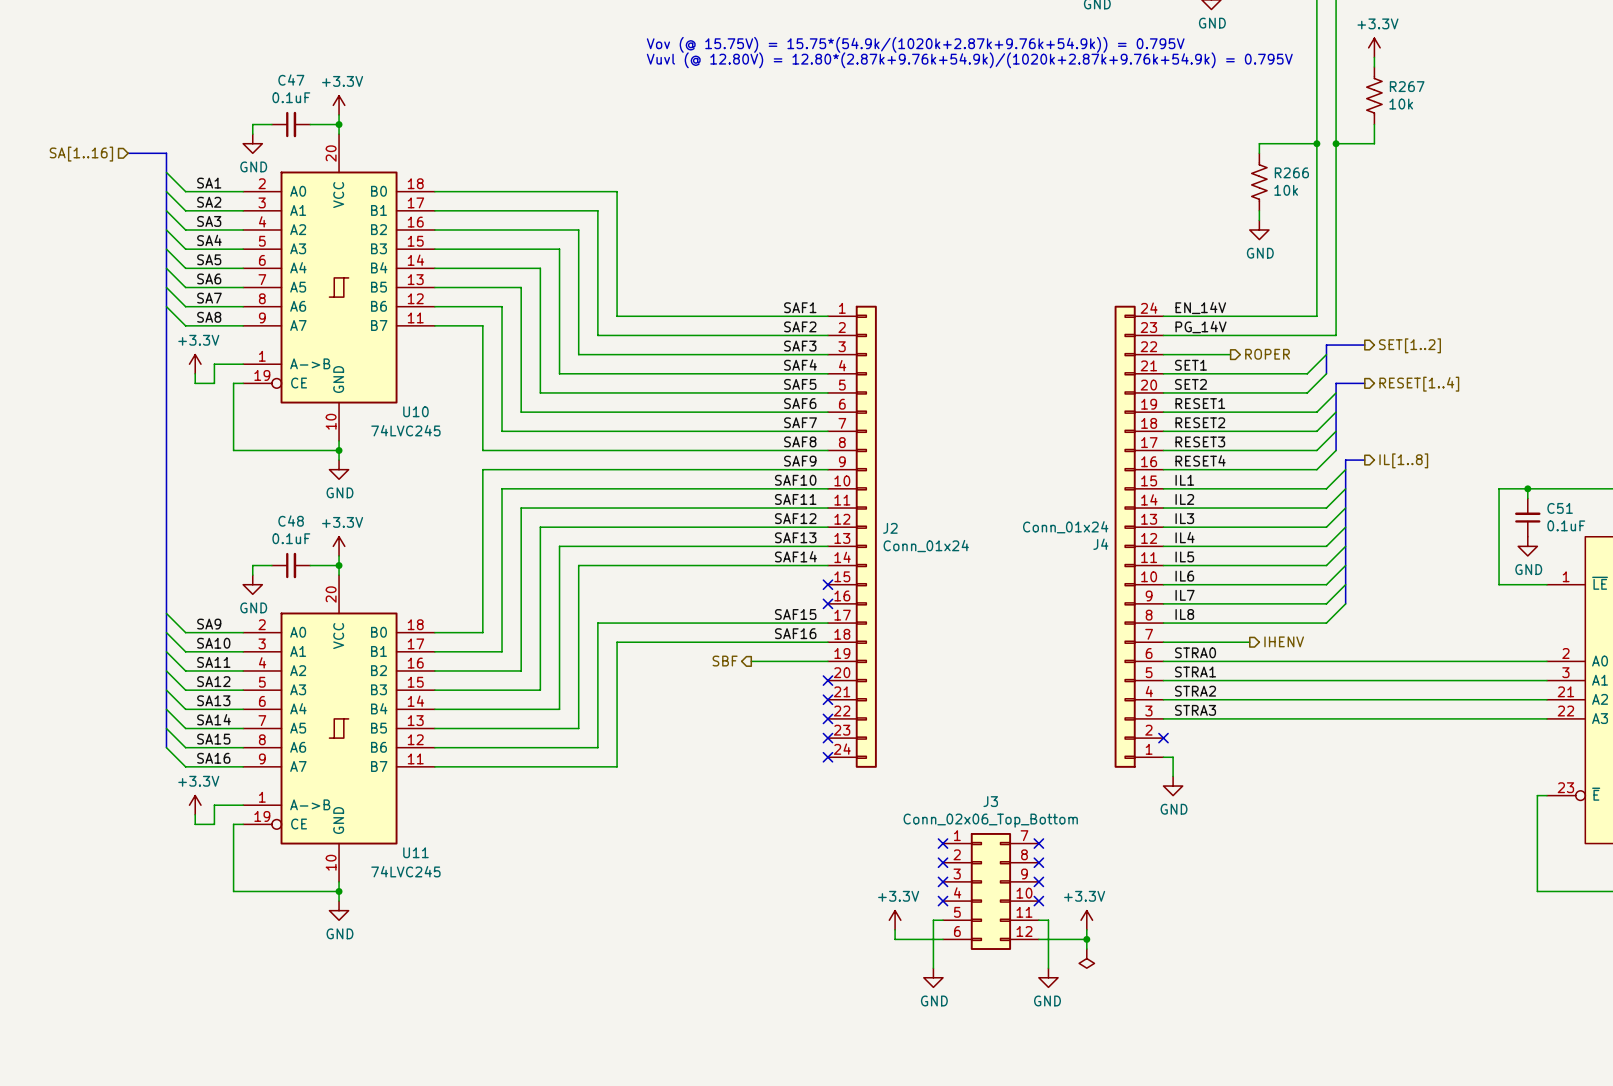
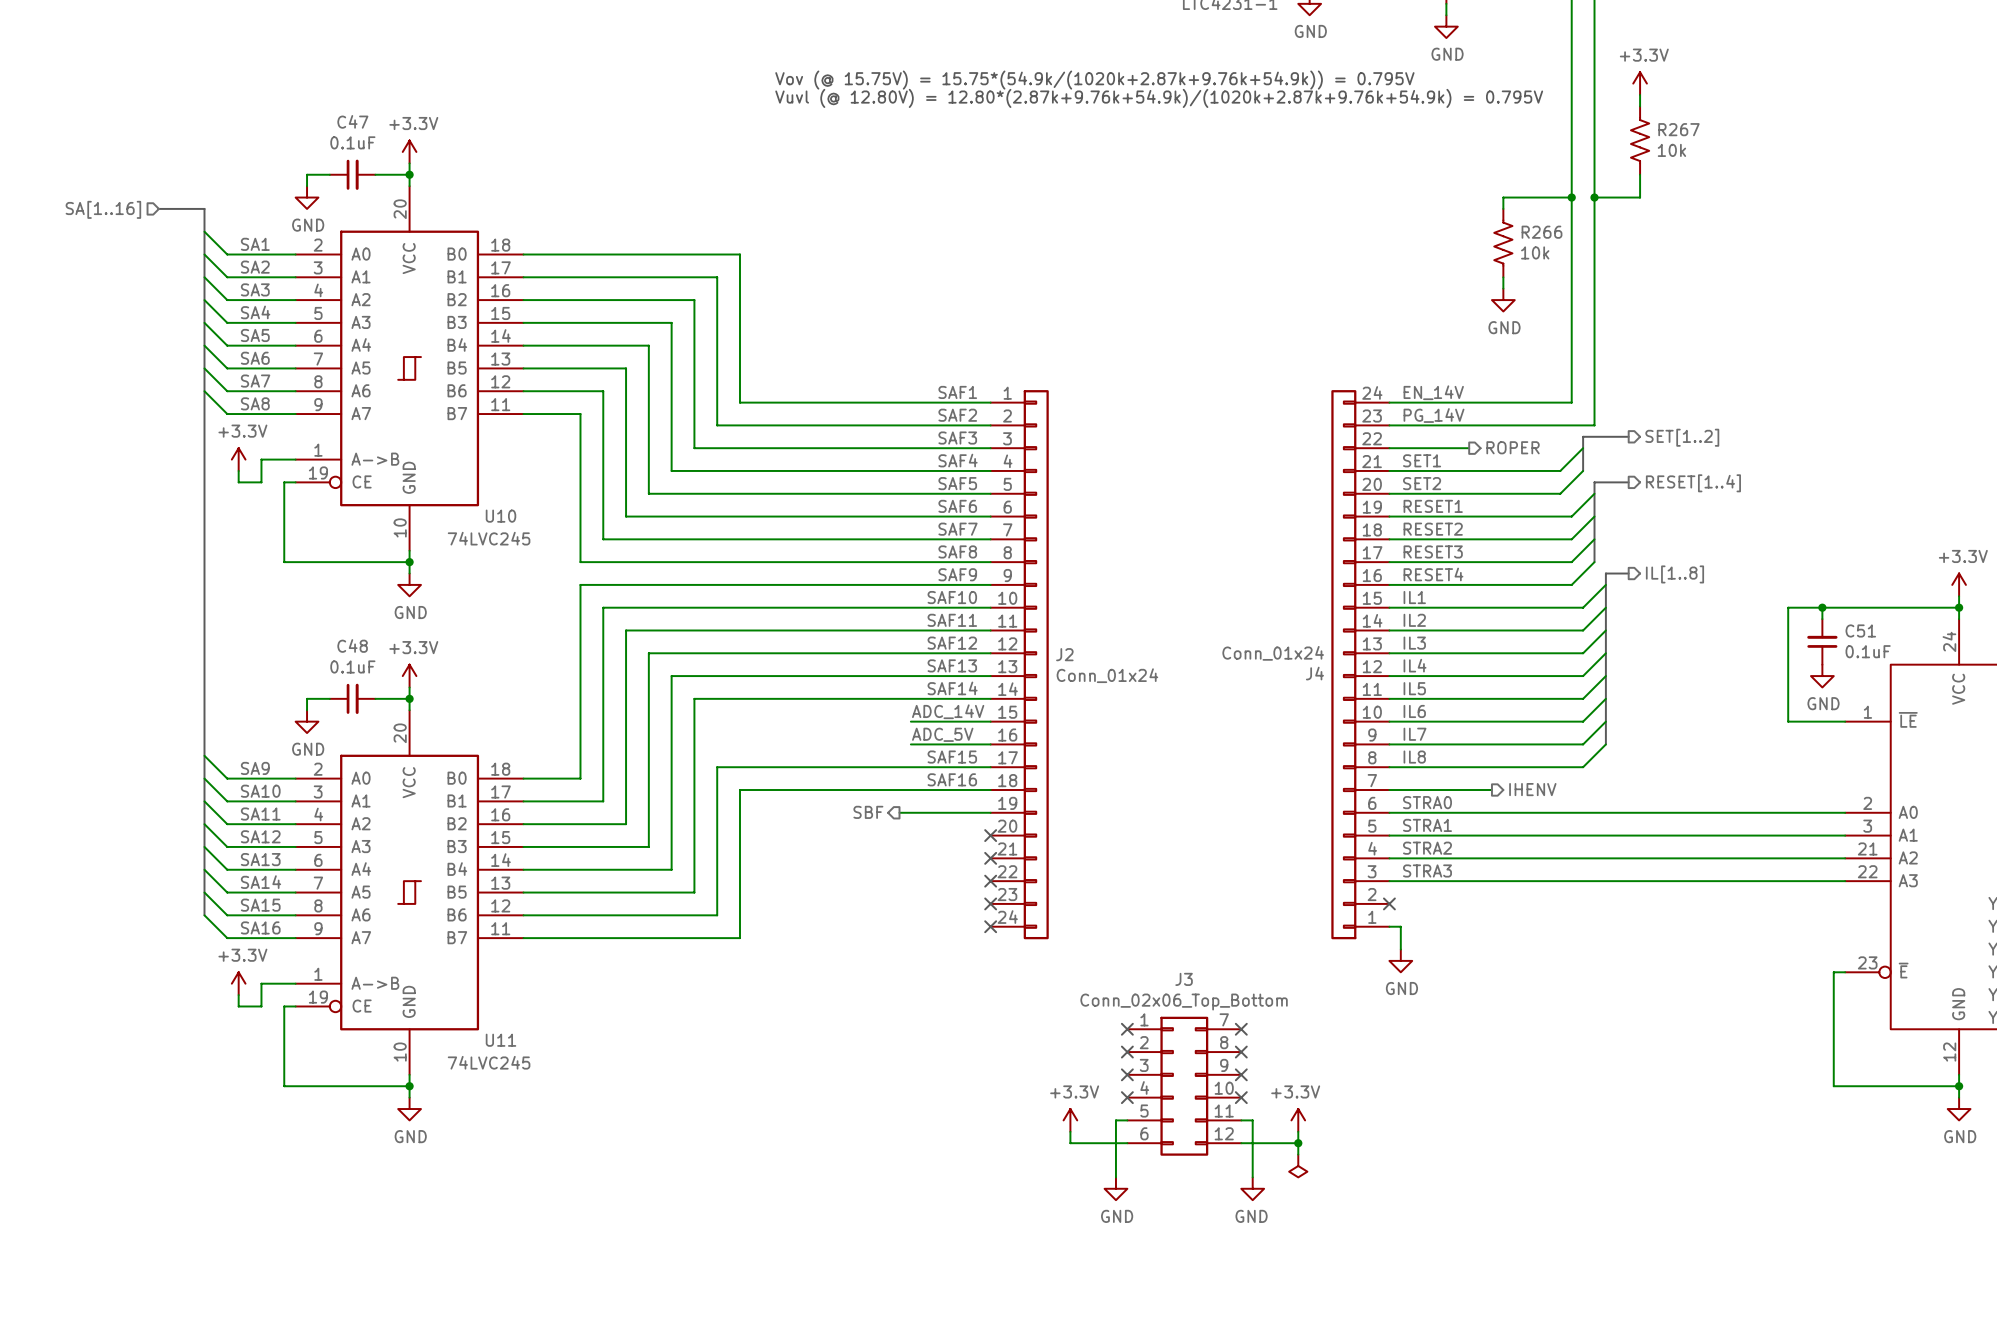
label: none -> ADC_14V (948, 711)
wire: none -> (910, 721) (990, 721)
no-connect mark: (827, 584) -> none
label: none -> ADC_5V (942, 734)
wire: none -> (910, 744) (990, 744)
no-connect mark: (827, 603) -> none

